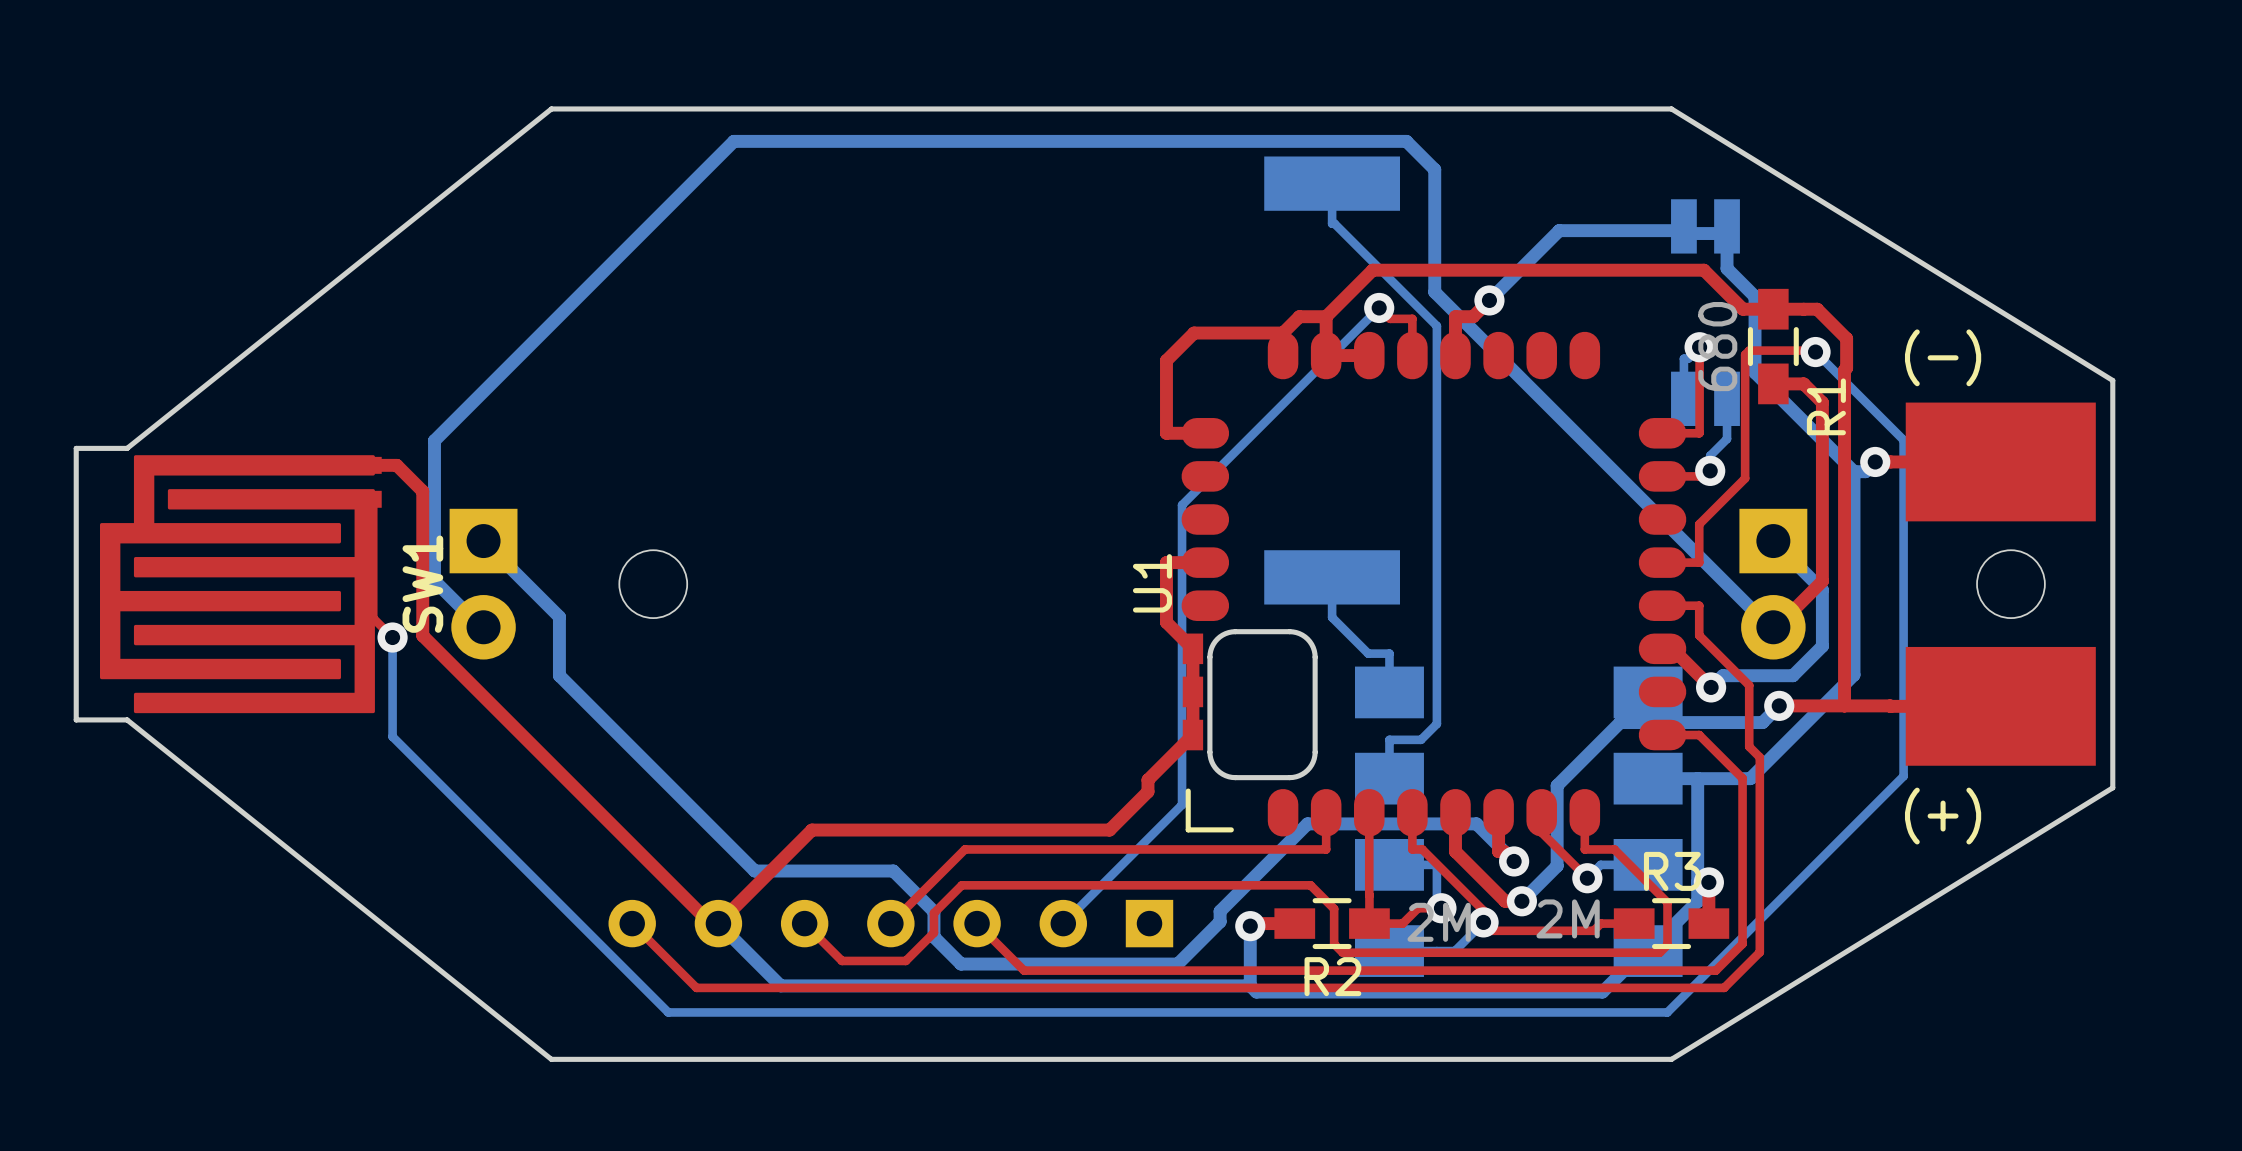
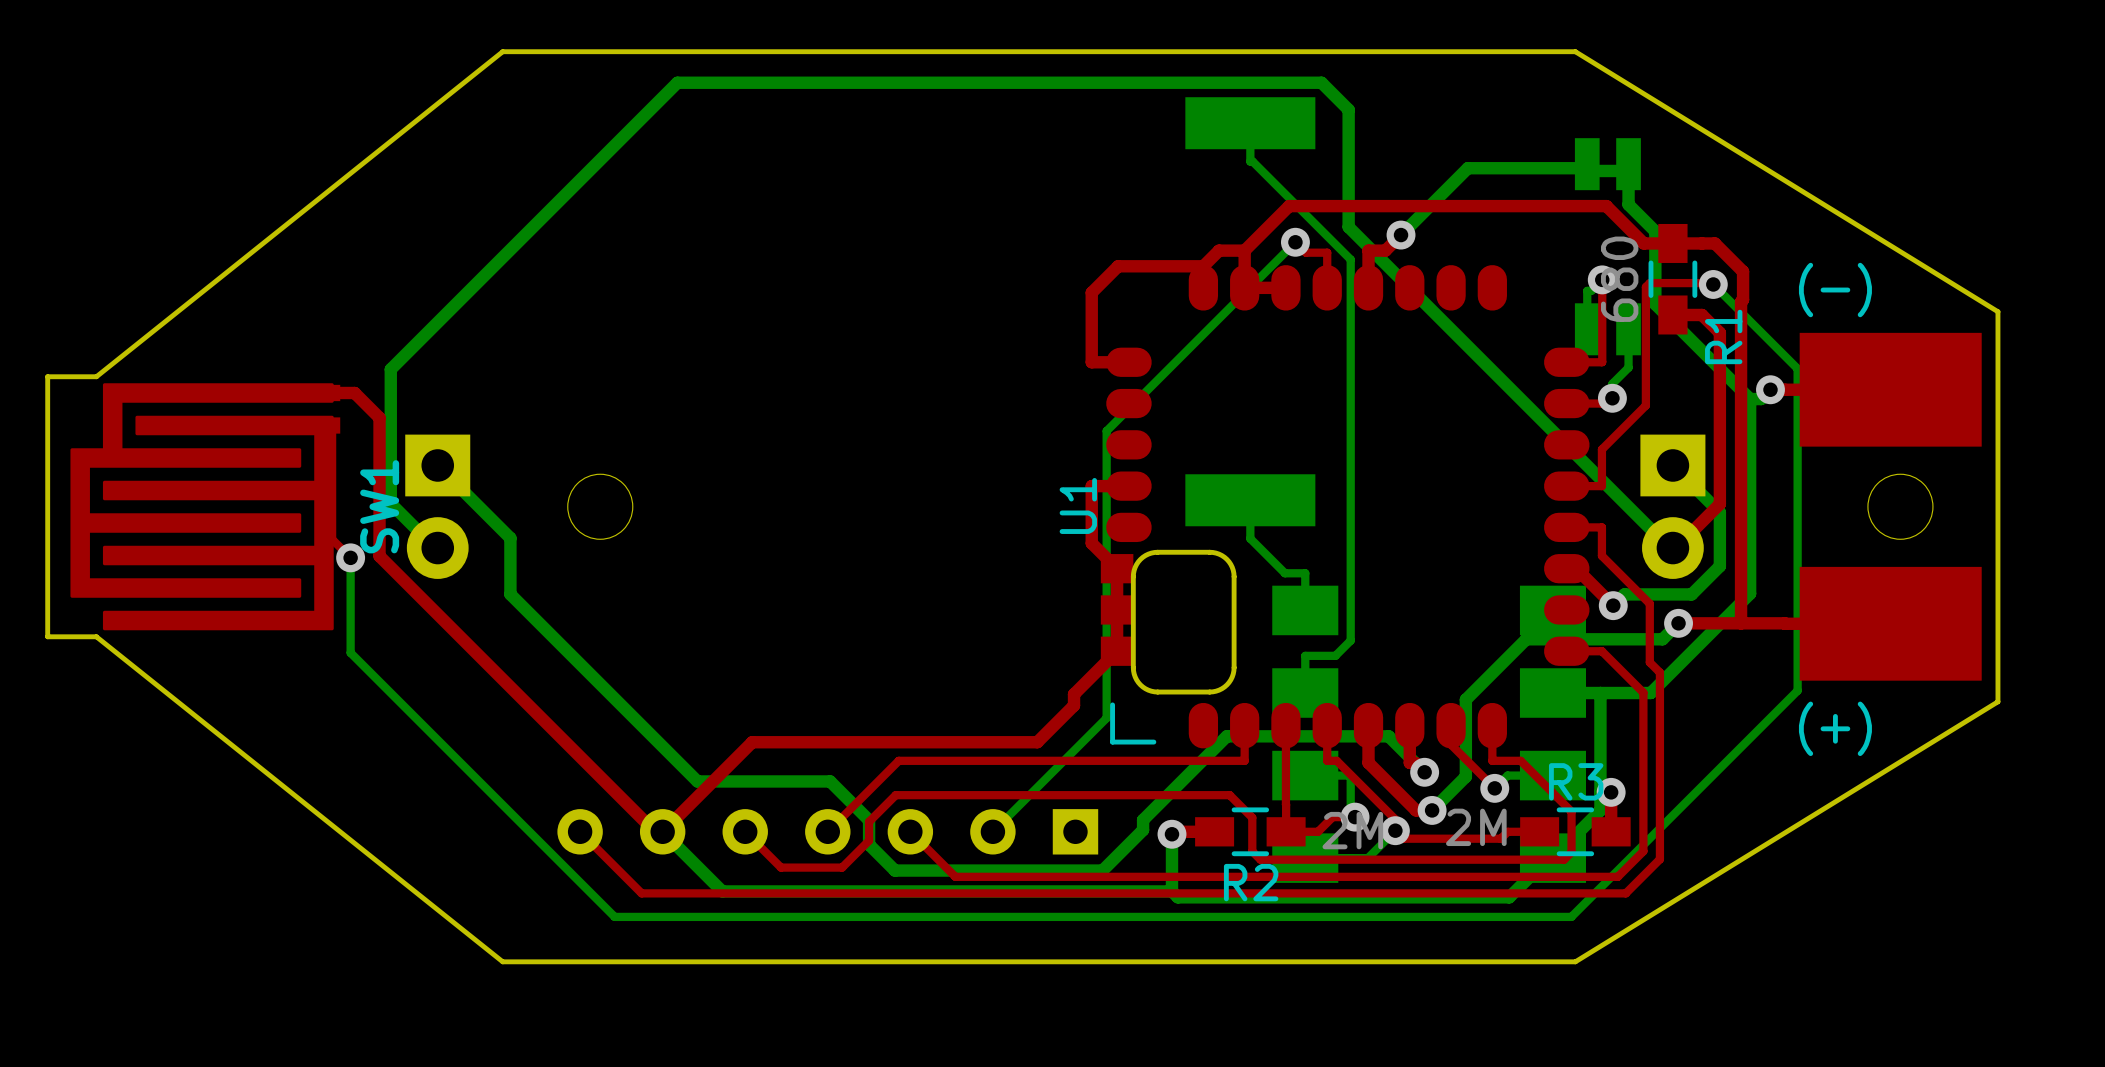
U1 footprint: [1181, 331, 1687, 837] -> [1100, 265, 1590, 749]

